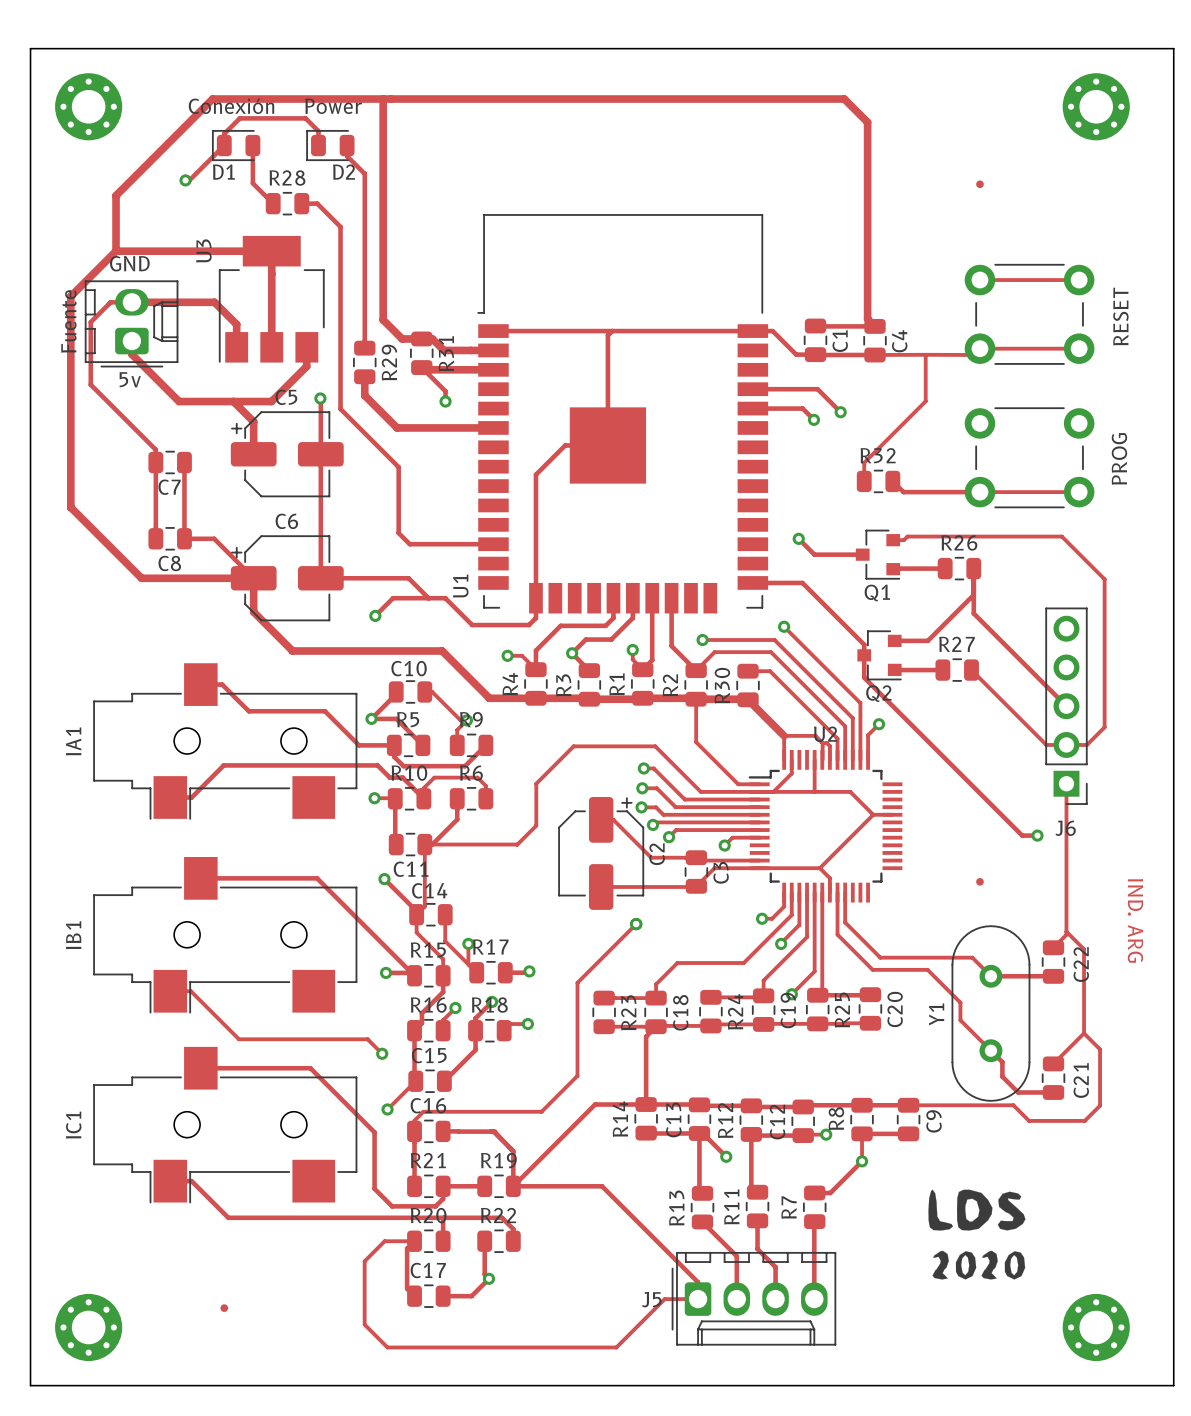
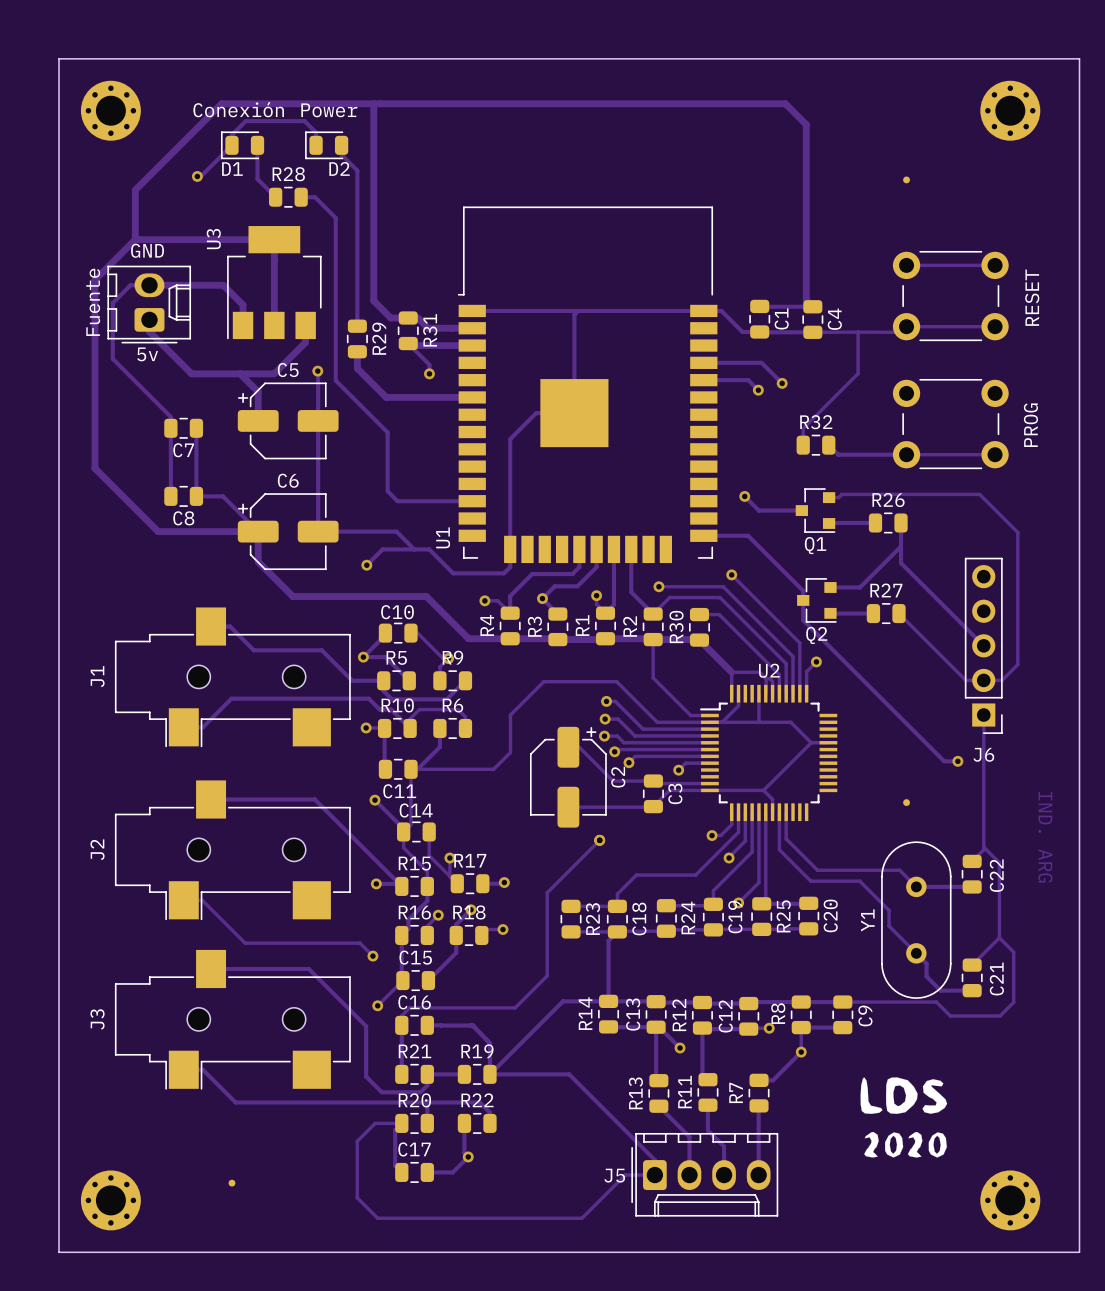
IA1 name: IA1 (73, 741) -> J1 (97, 676)
IB1 name: IB1 (73, 935) -> J2 (97, 849)
IC1 name: IC1 (73, 1125) -> J3 (97, 1019)

